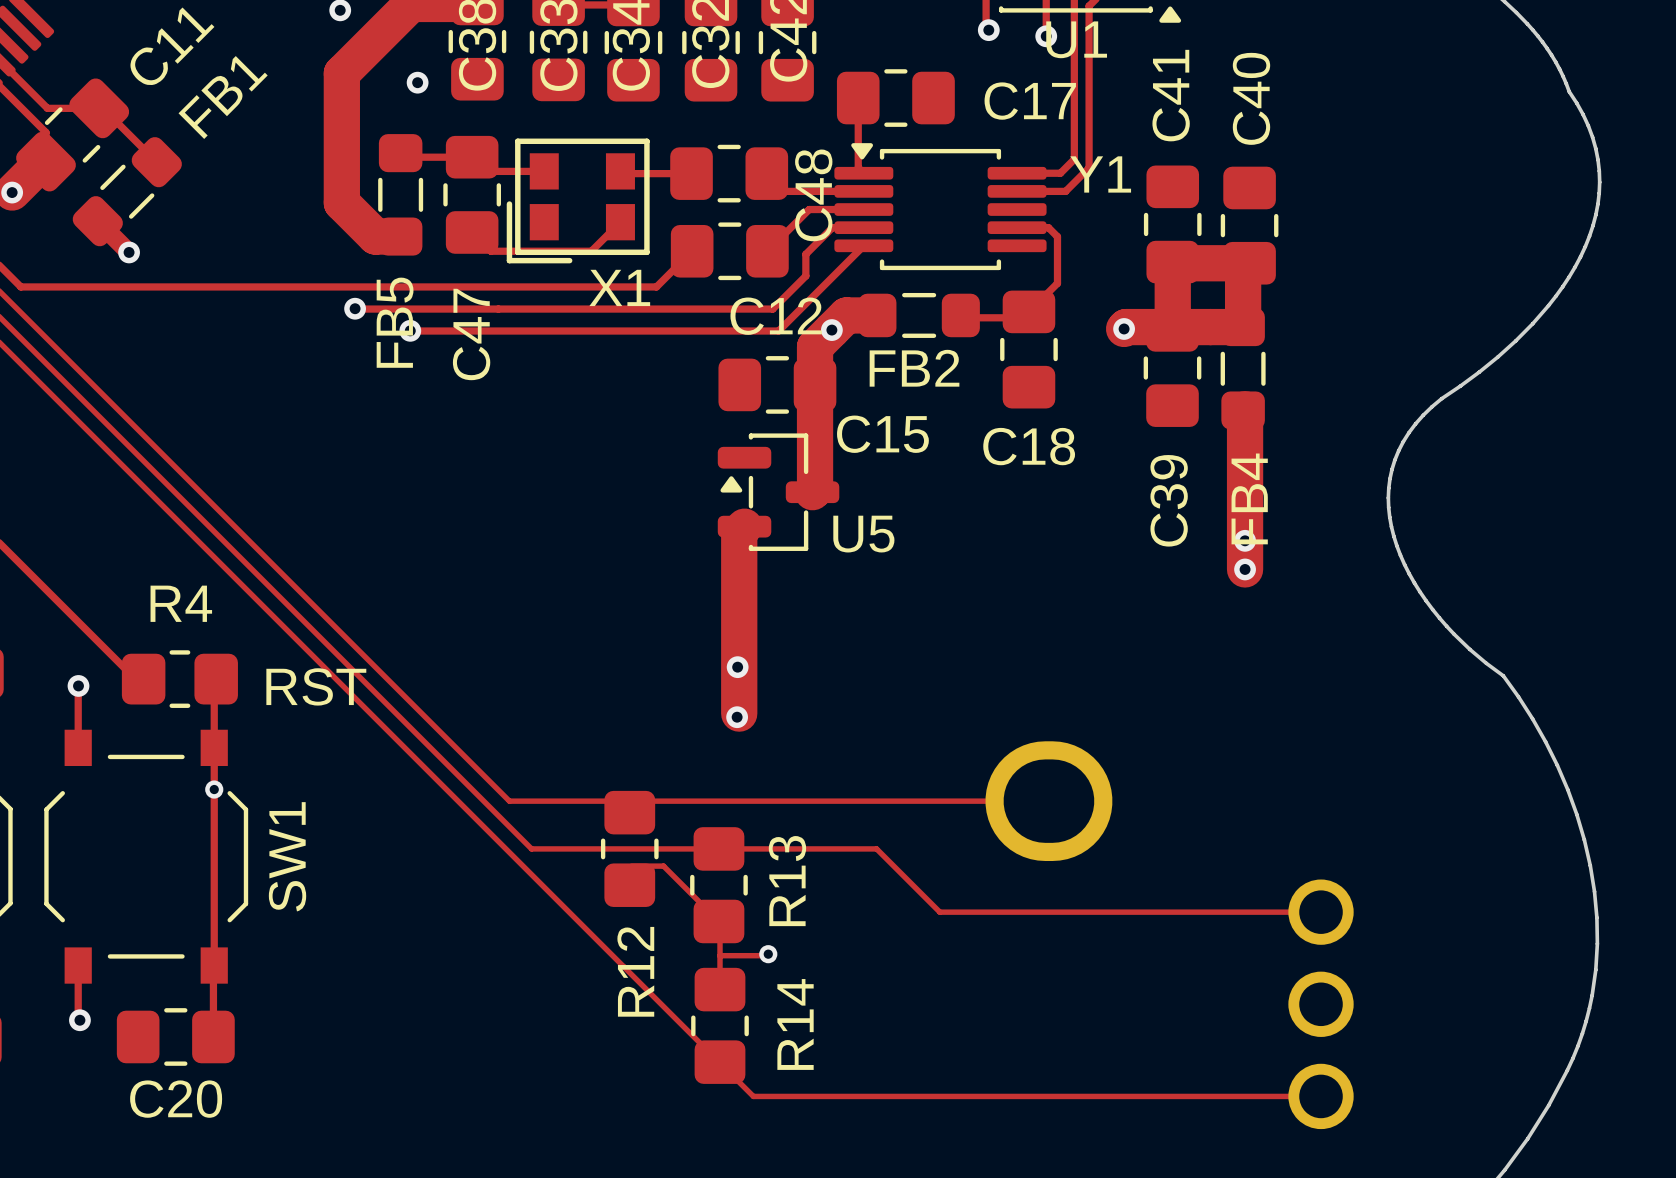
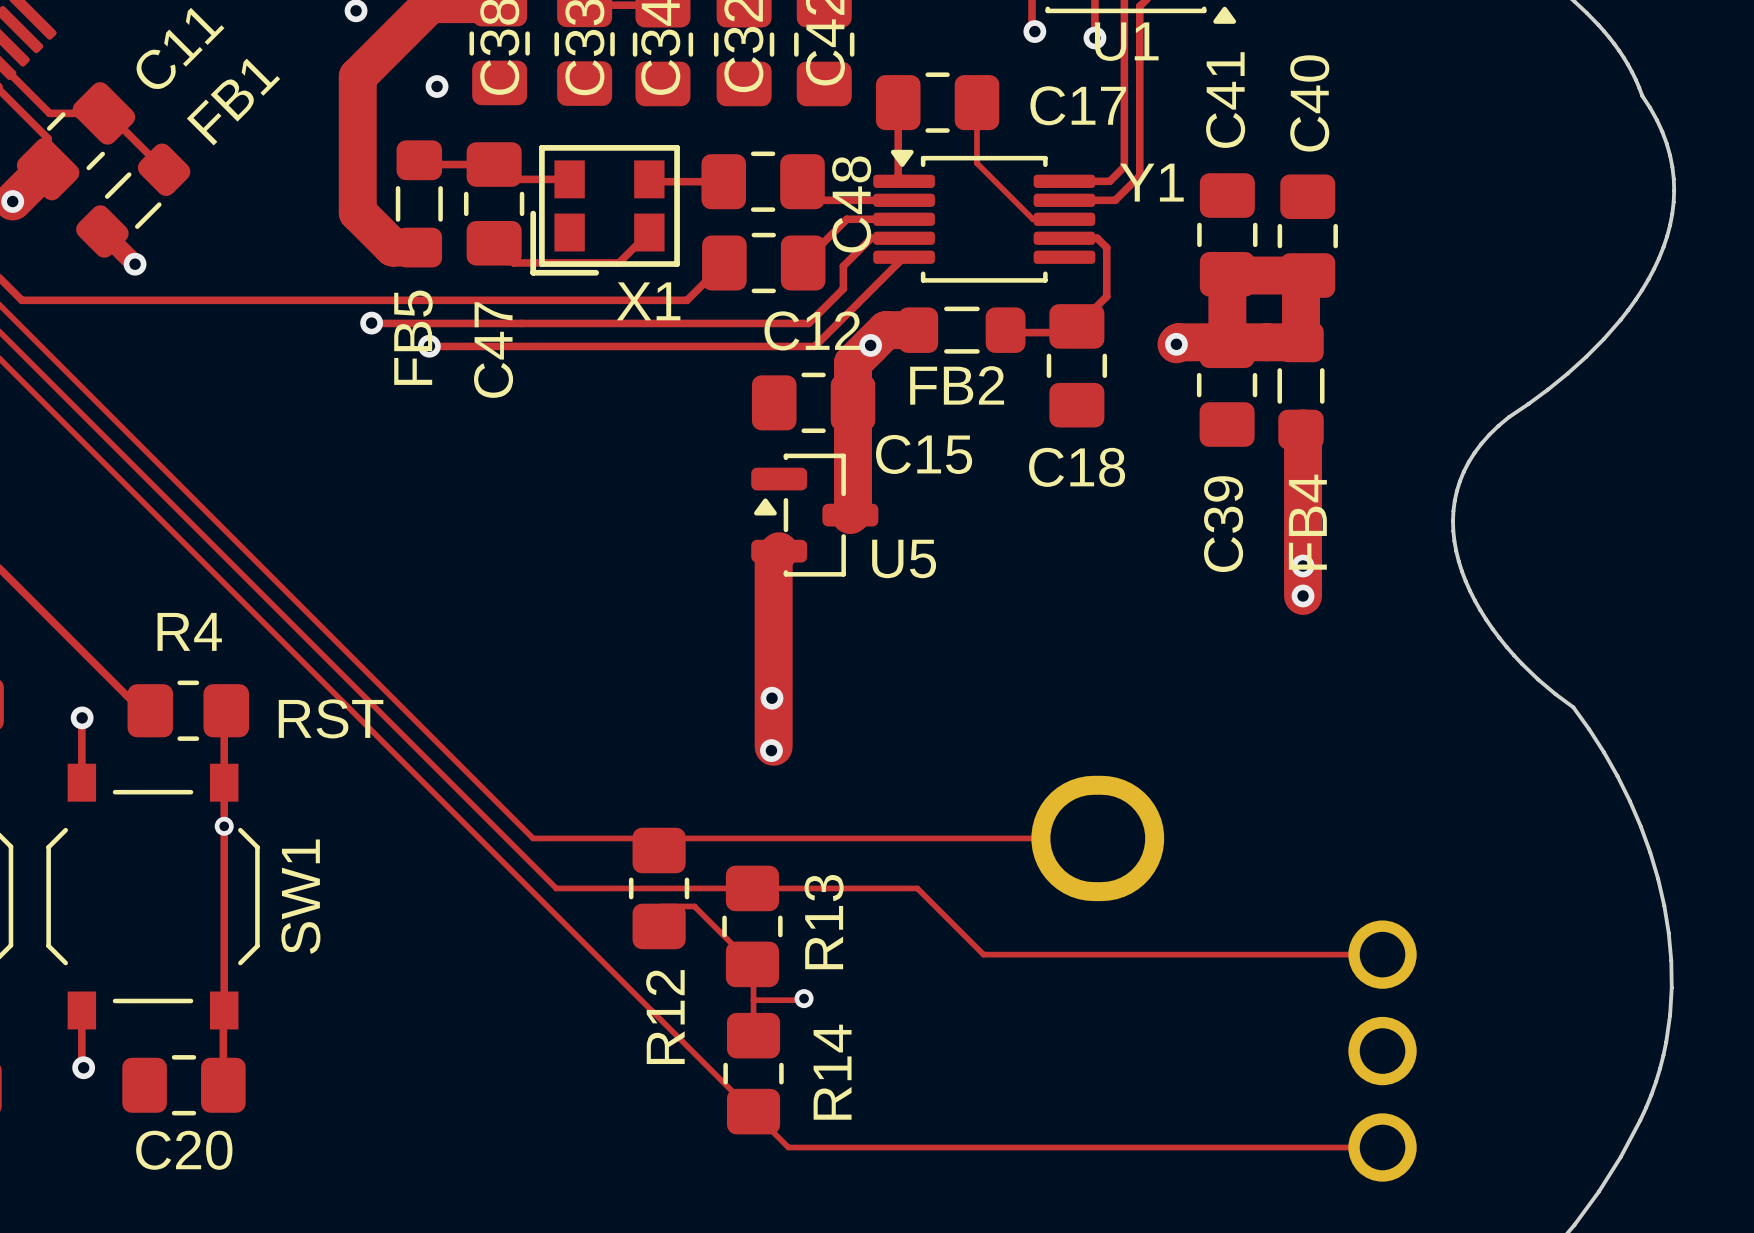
track: none -> (976, 102) (976, 163) (1032, 219) (1064, 219)

